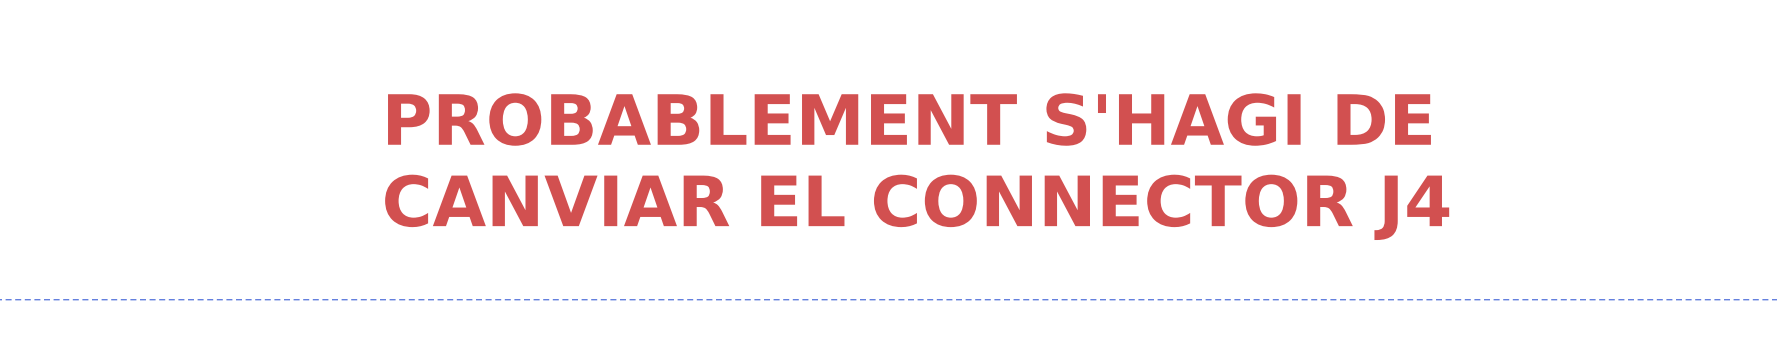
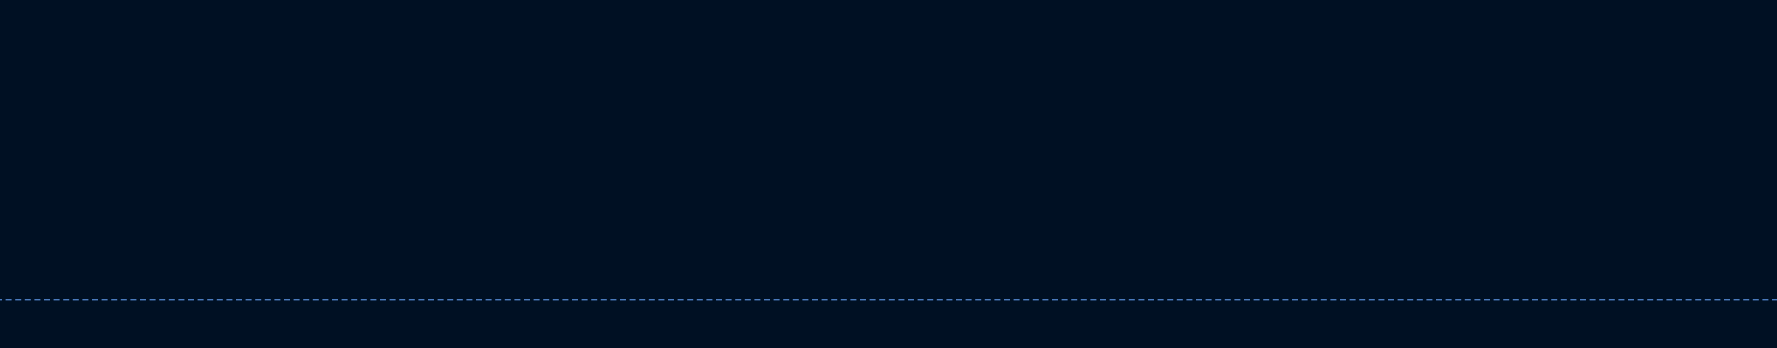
text: PROBABLEMENT S'HAGI DE (909, 119) -> none
text: CANVIAR EL CONNECTOR J4 (917, 207) -> none

